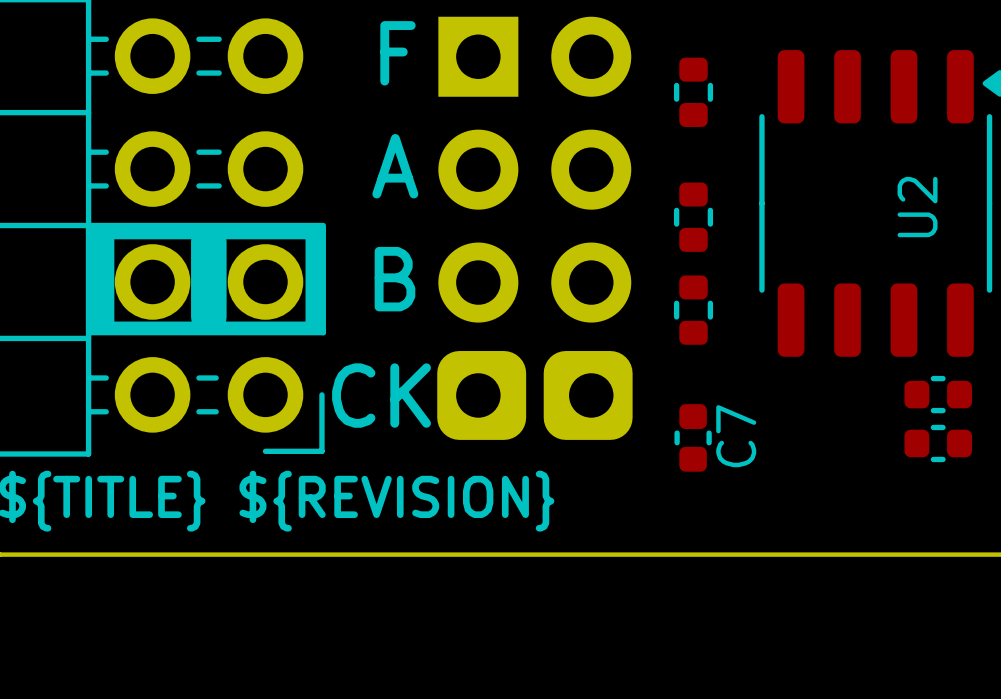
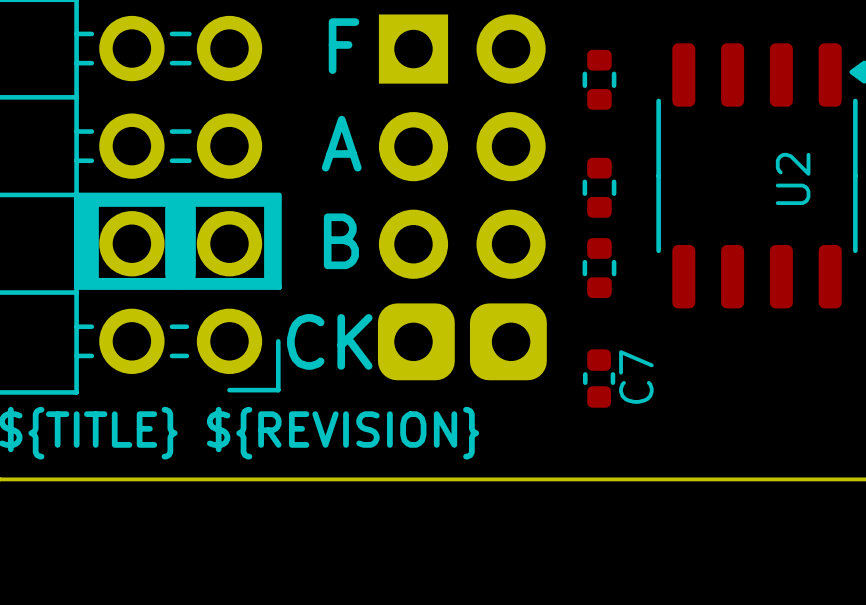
part: (938, 394) -> none
part: (938, 443) -> none

